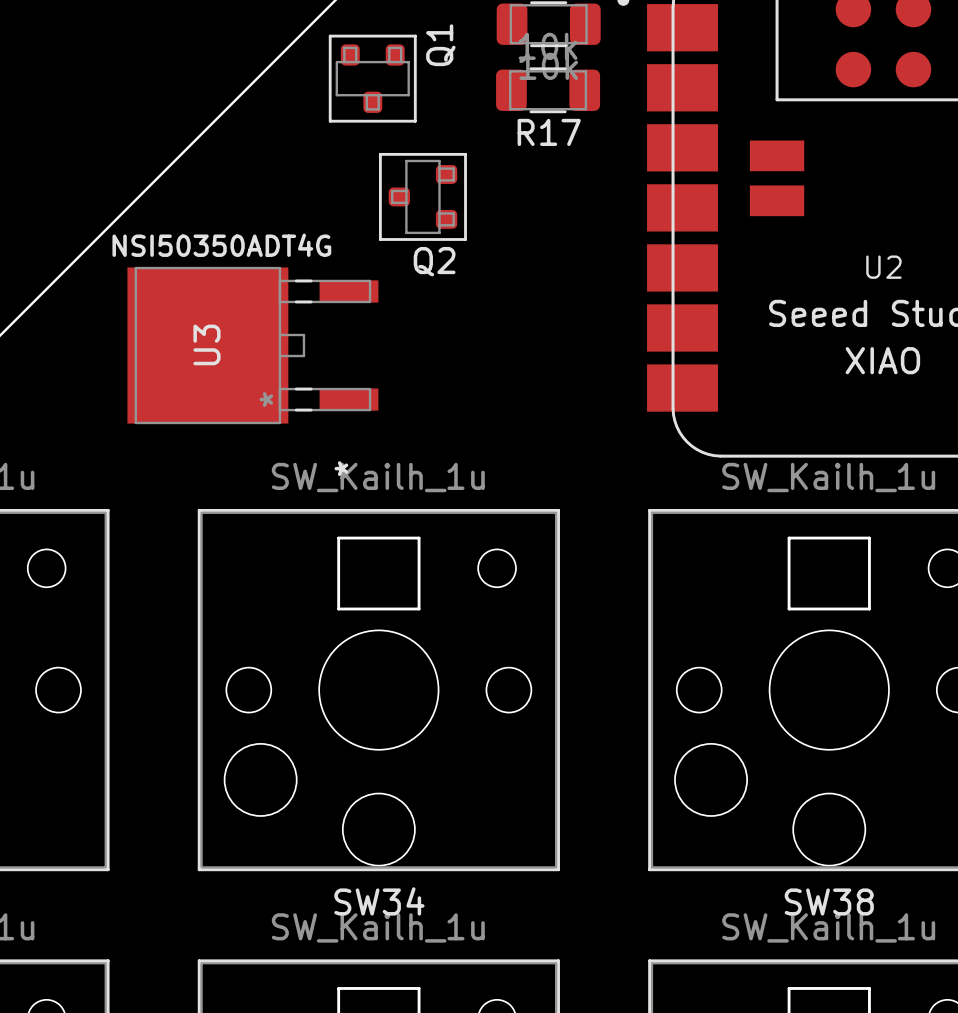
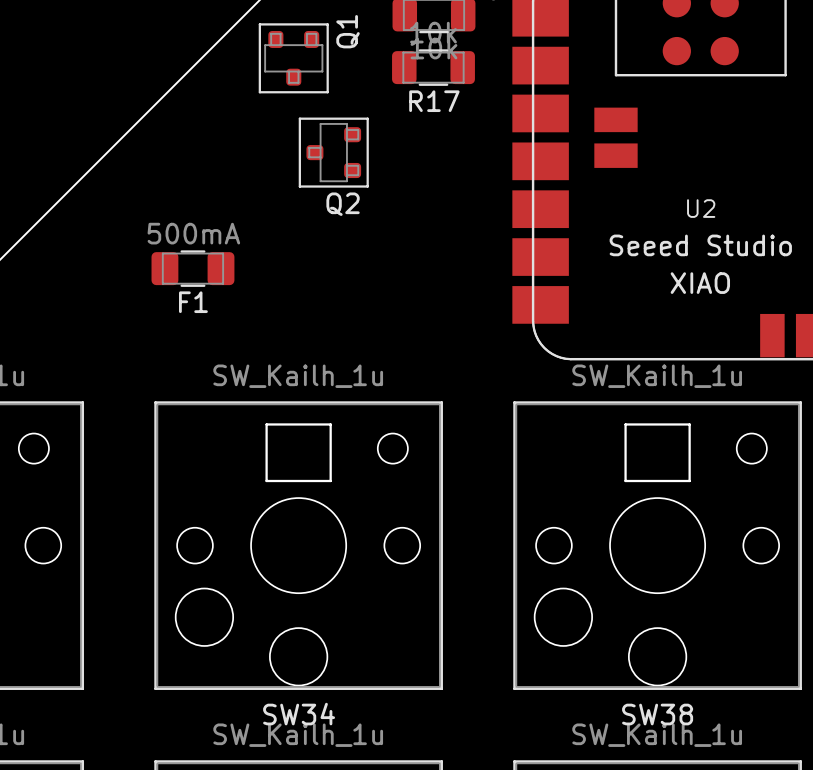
F1: none -> 500mA (192, 268)
U3: NSI50350ADT4G (252, 345) -> none

